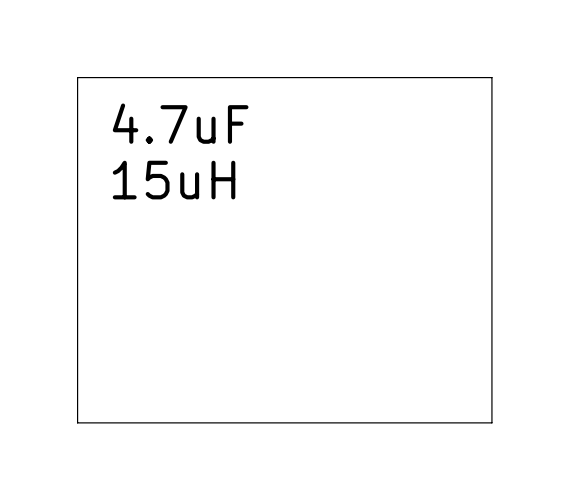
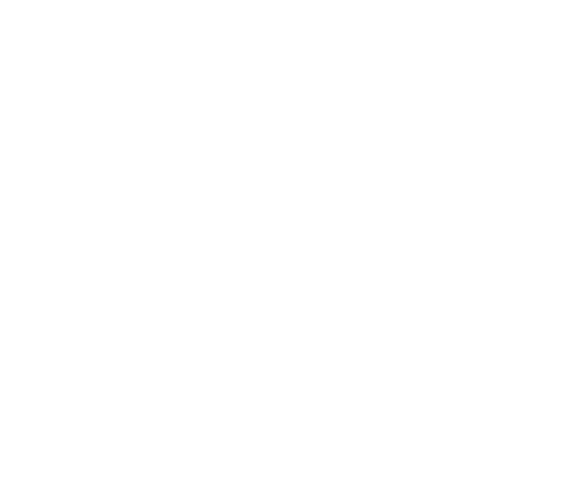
line: (77, 77) (491, 77) (491, 422) (77, 422) (77, 77) -> none
text: 4.7uF (180, 123) -> none
text: 15uH (174, 180) -> none

